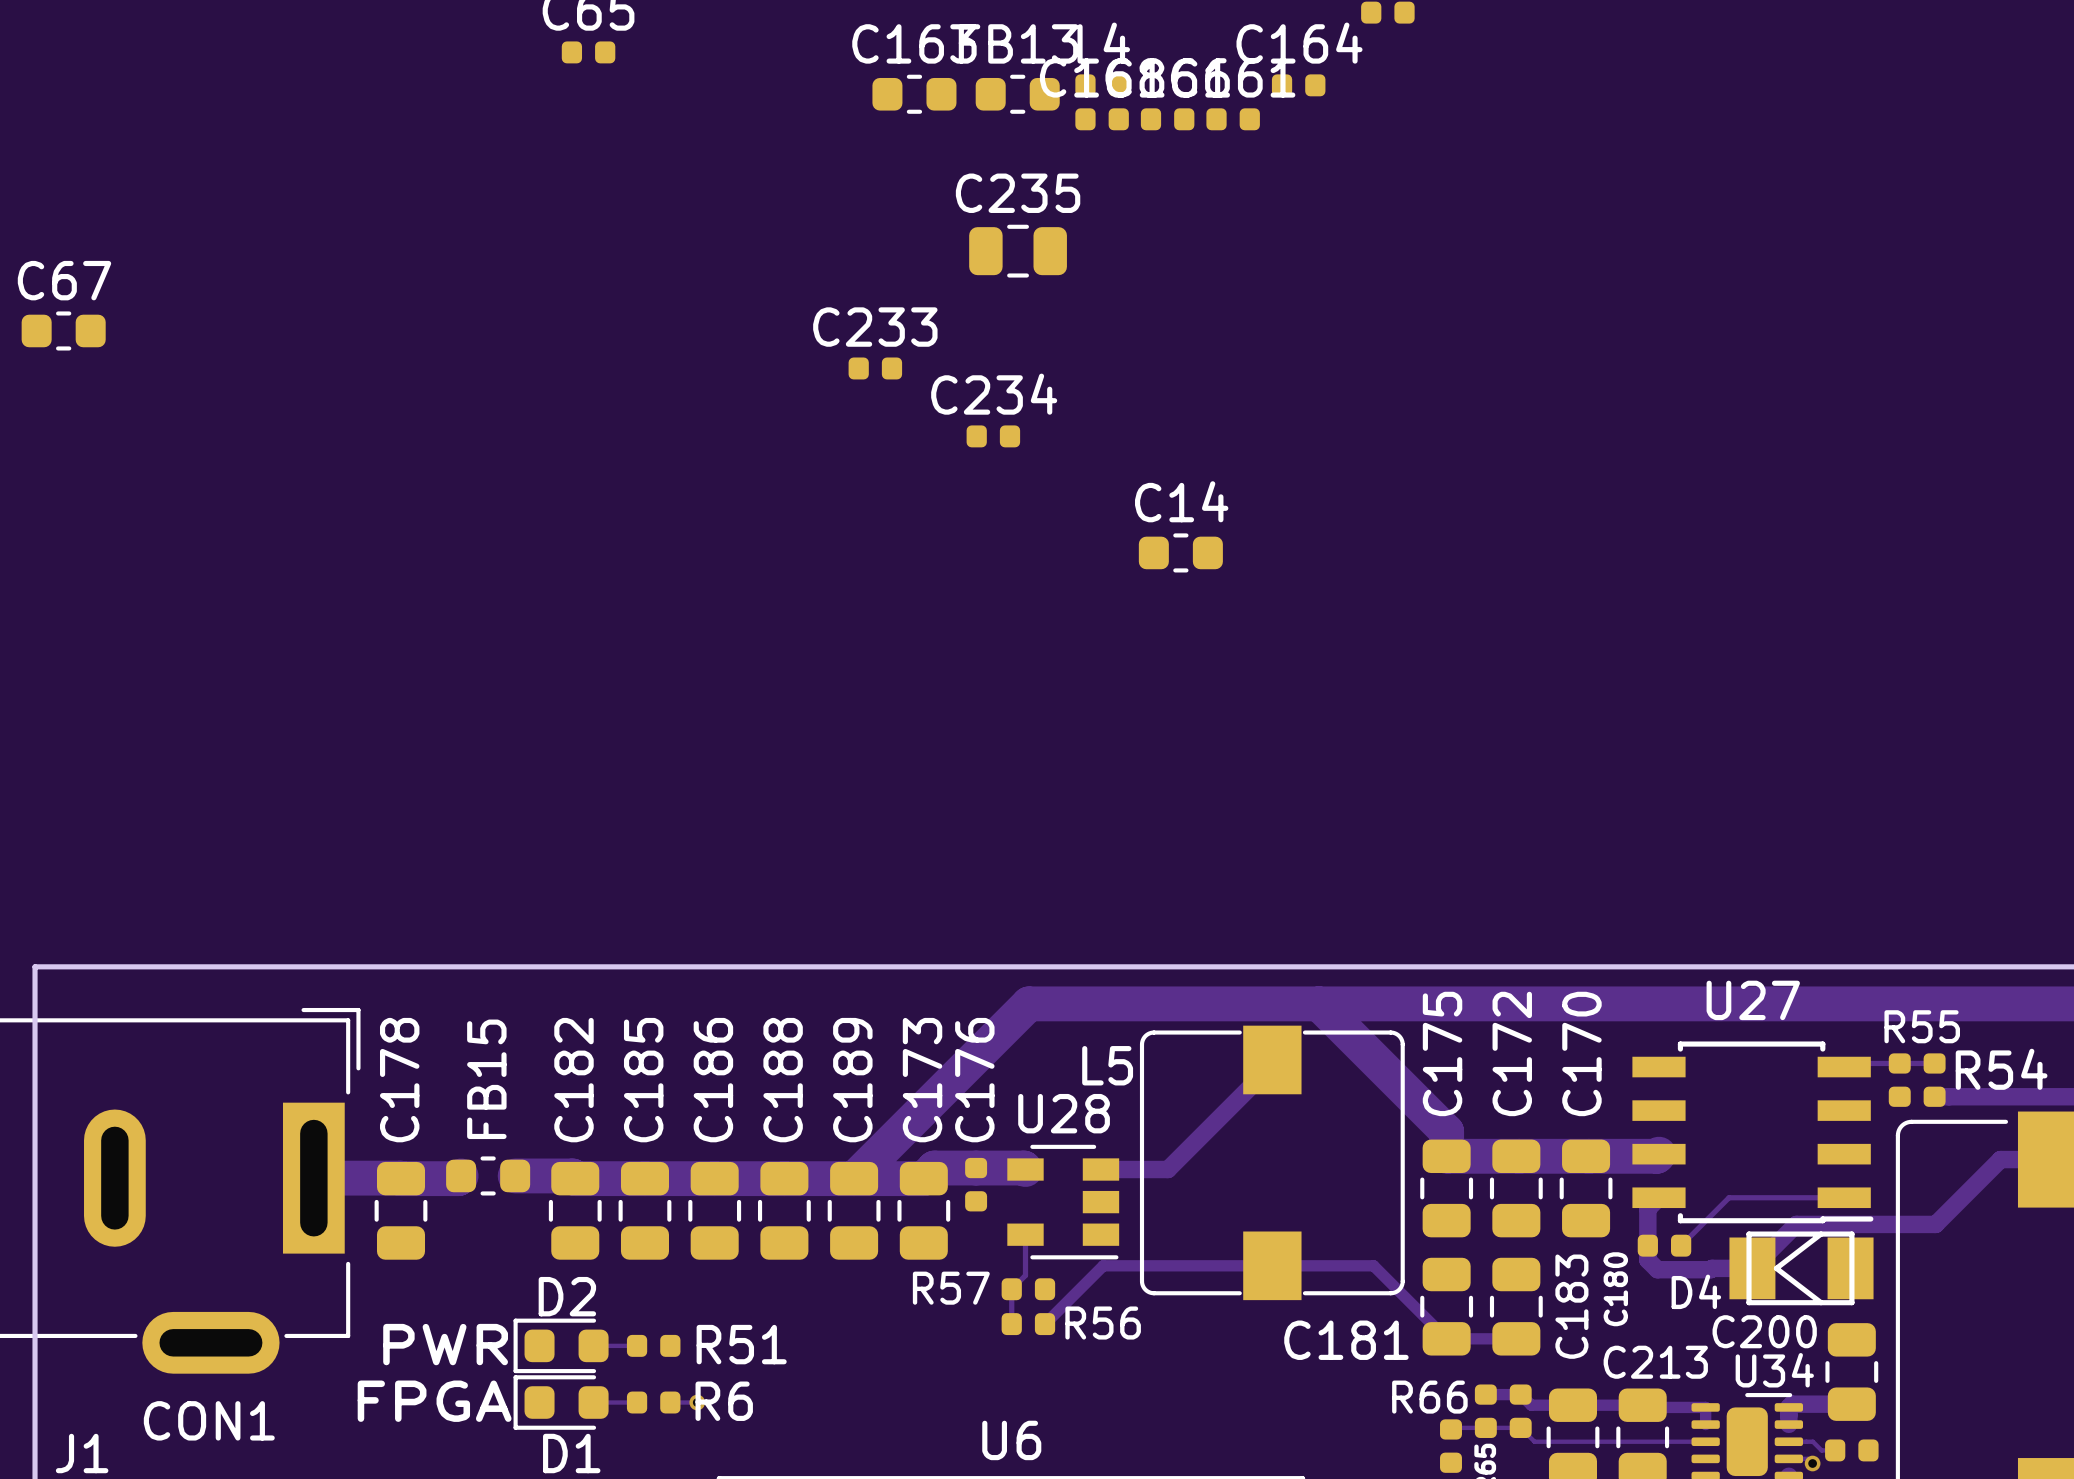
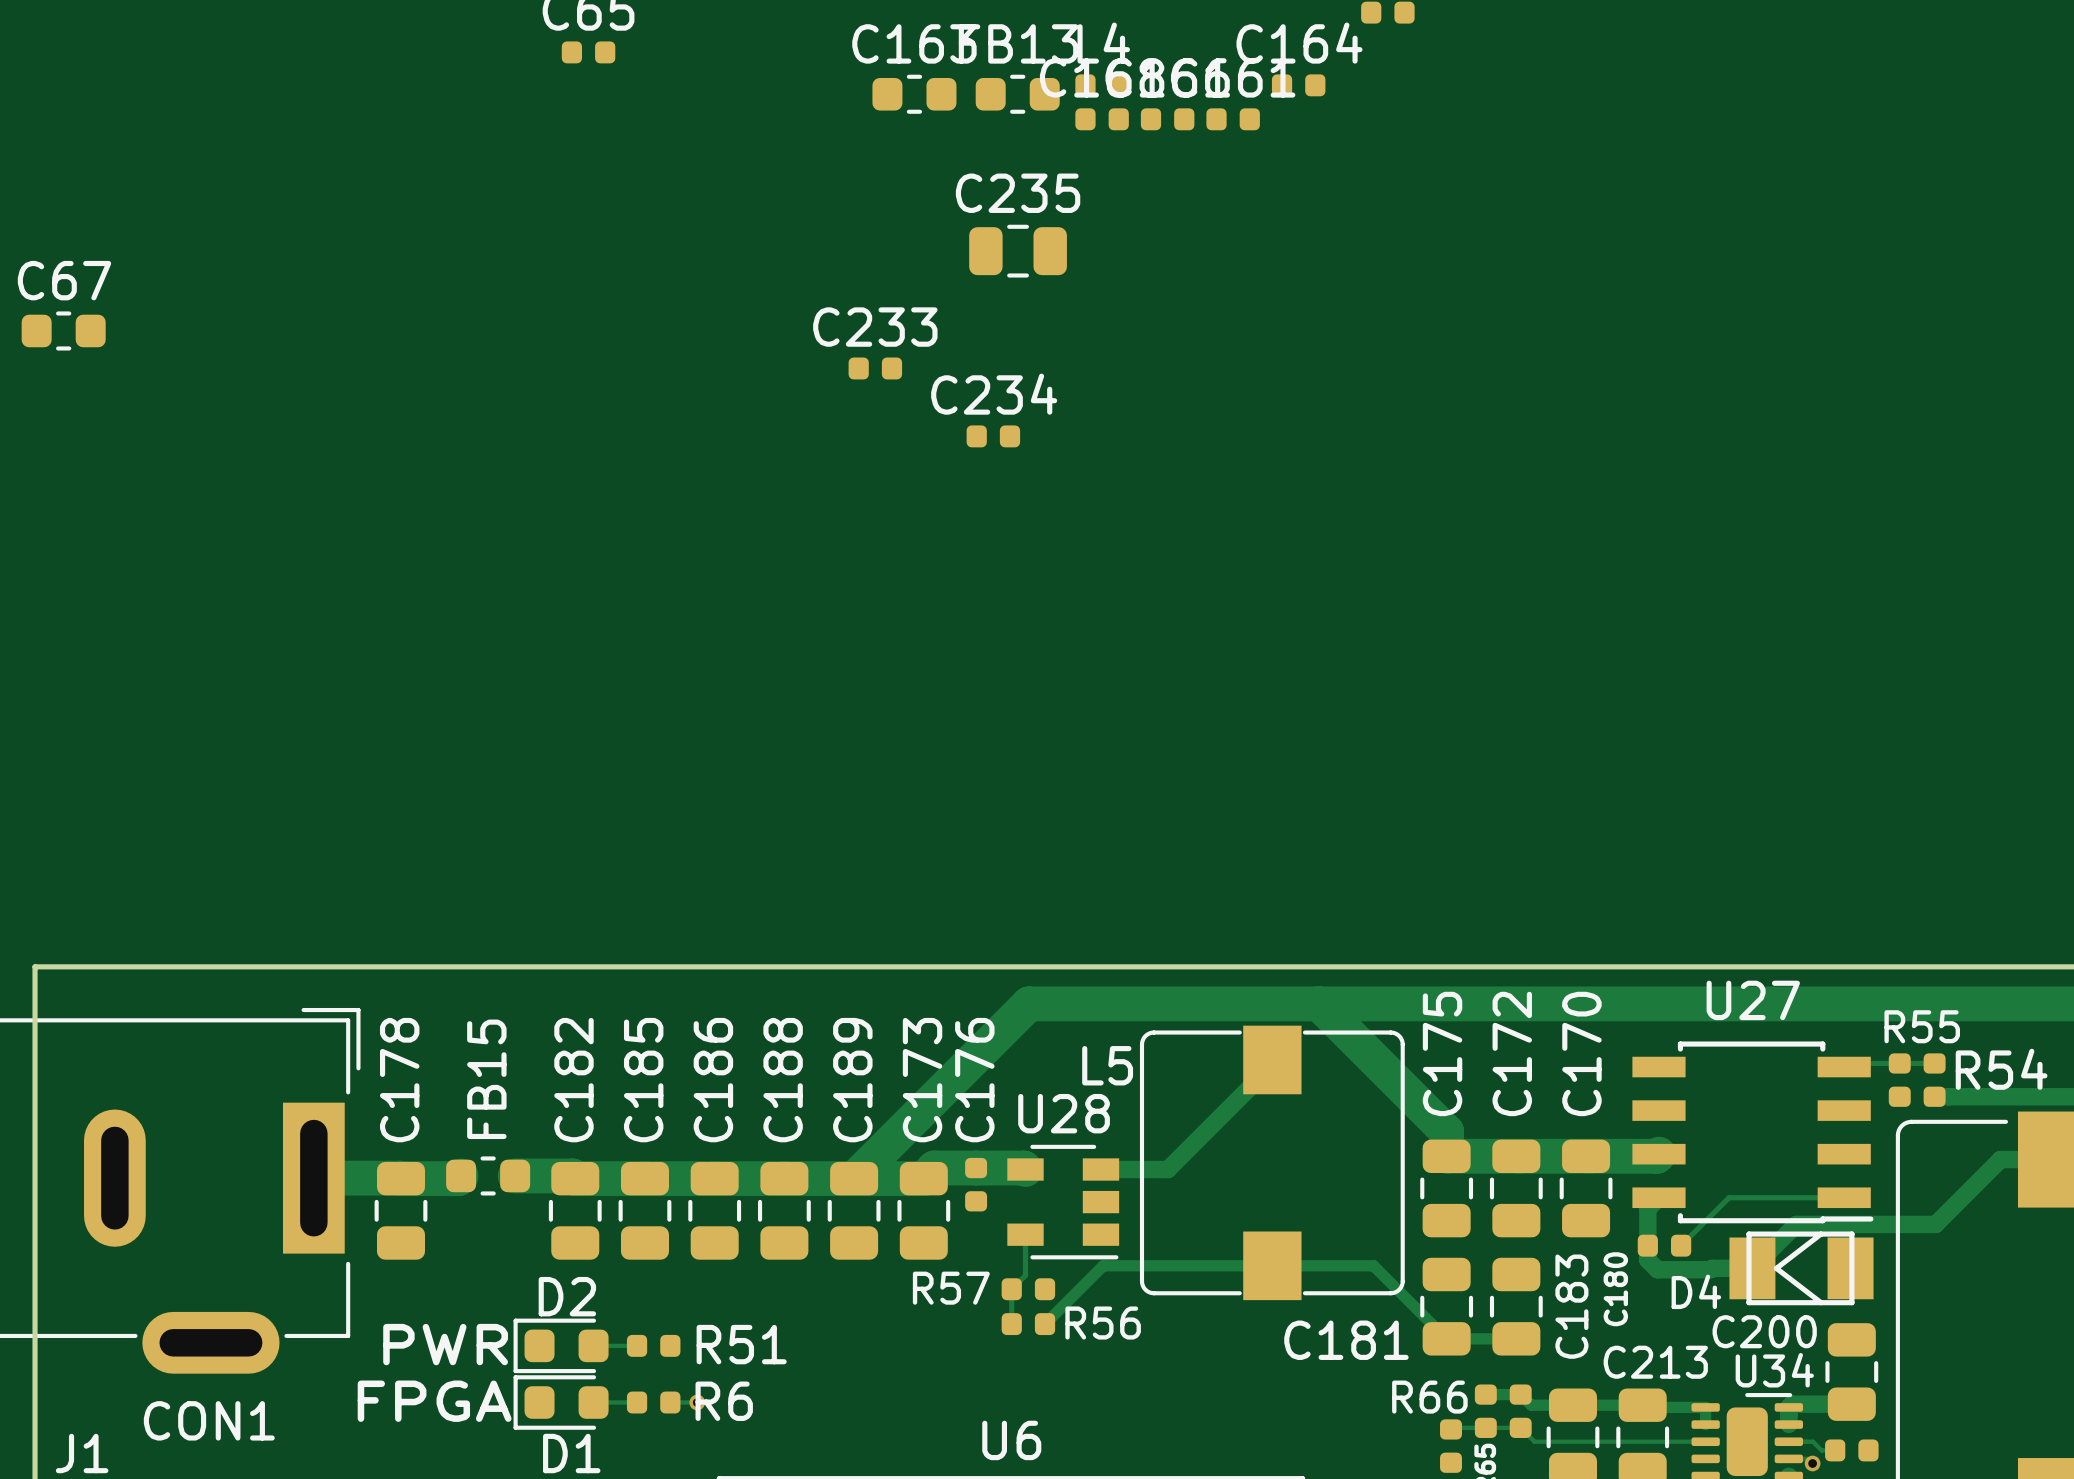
C14: (1180, 552) -> none

